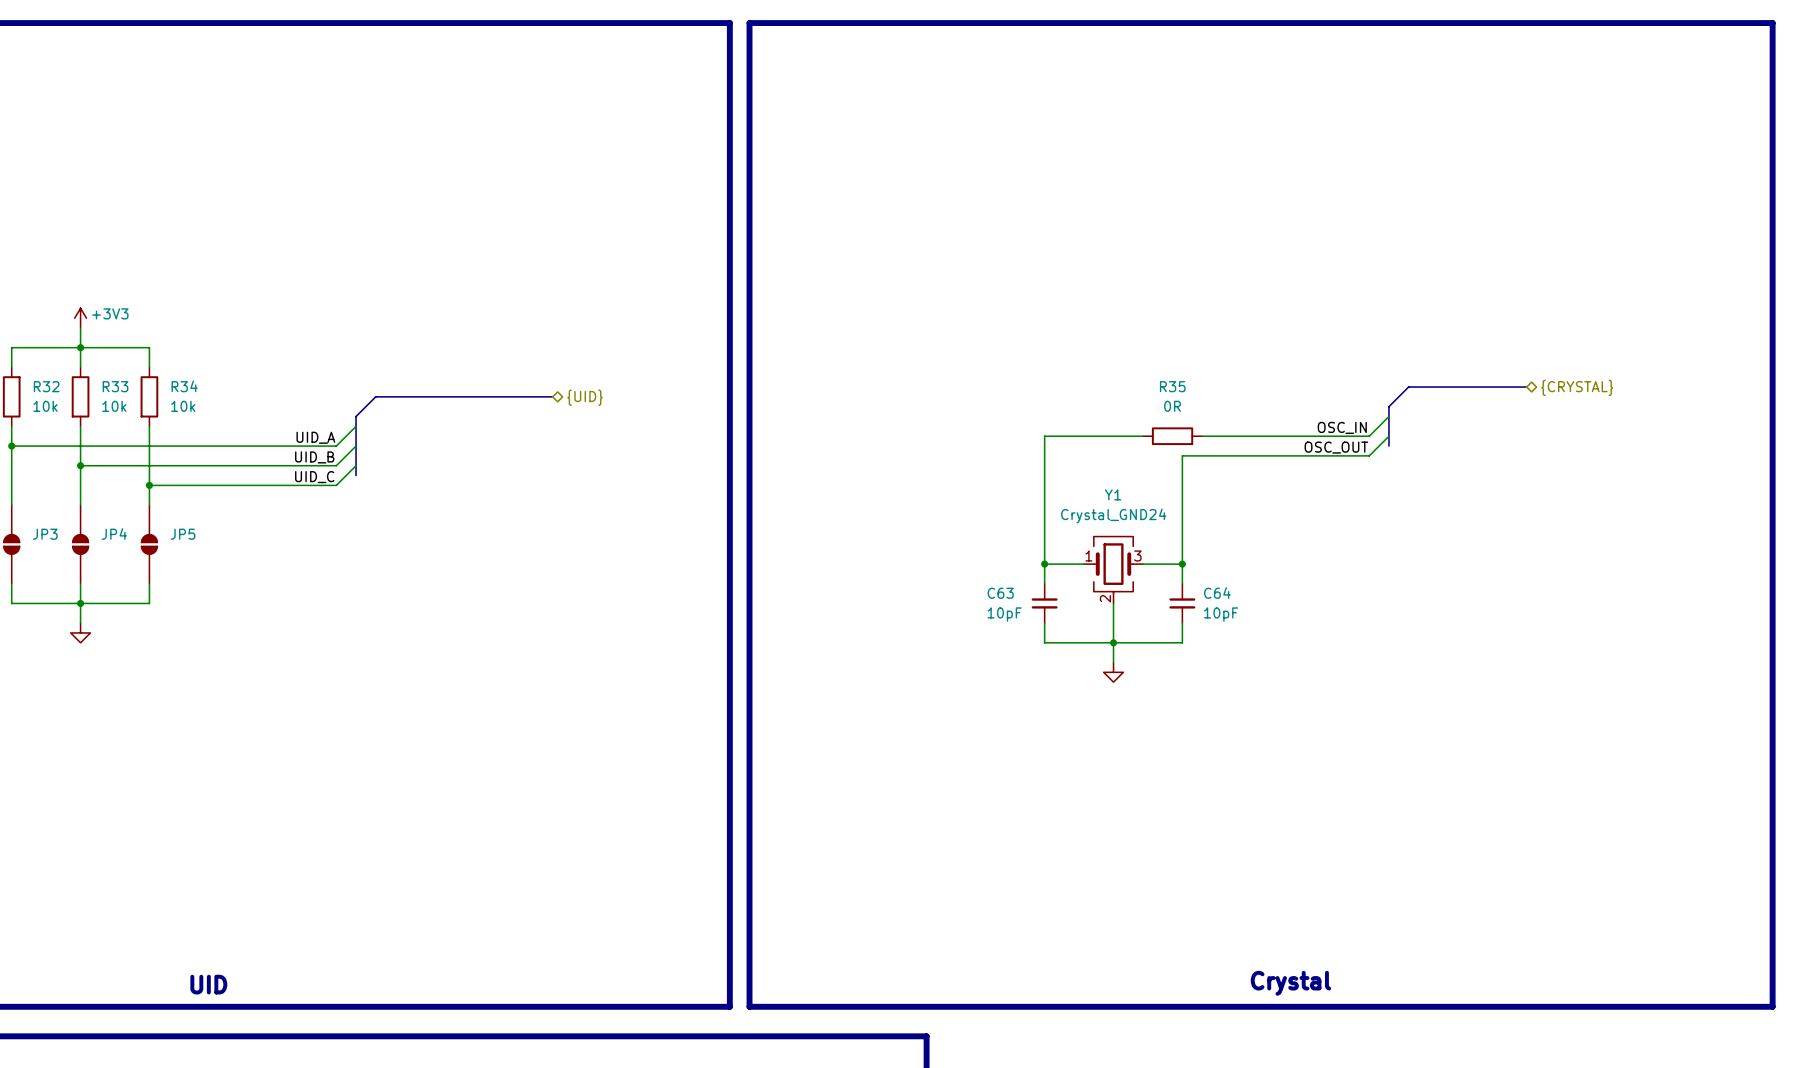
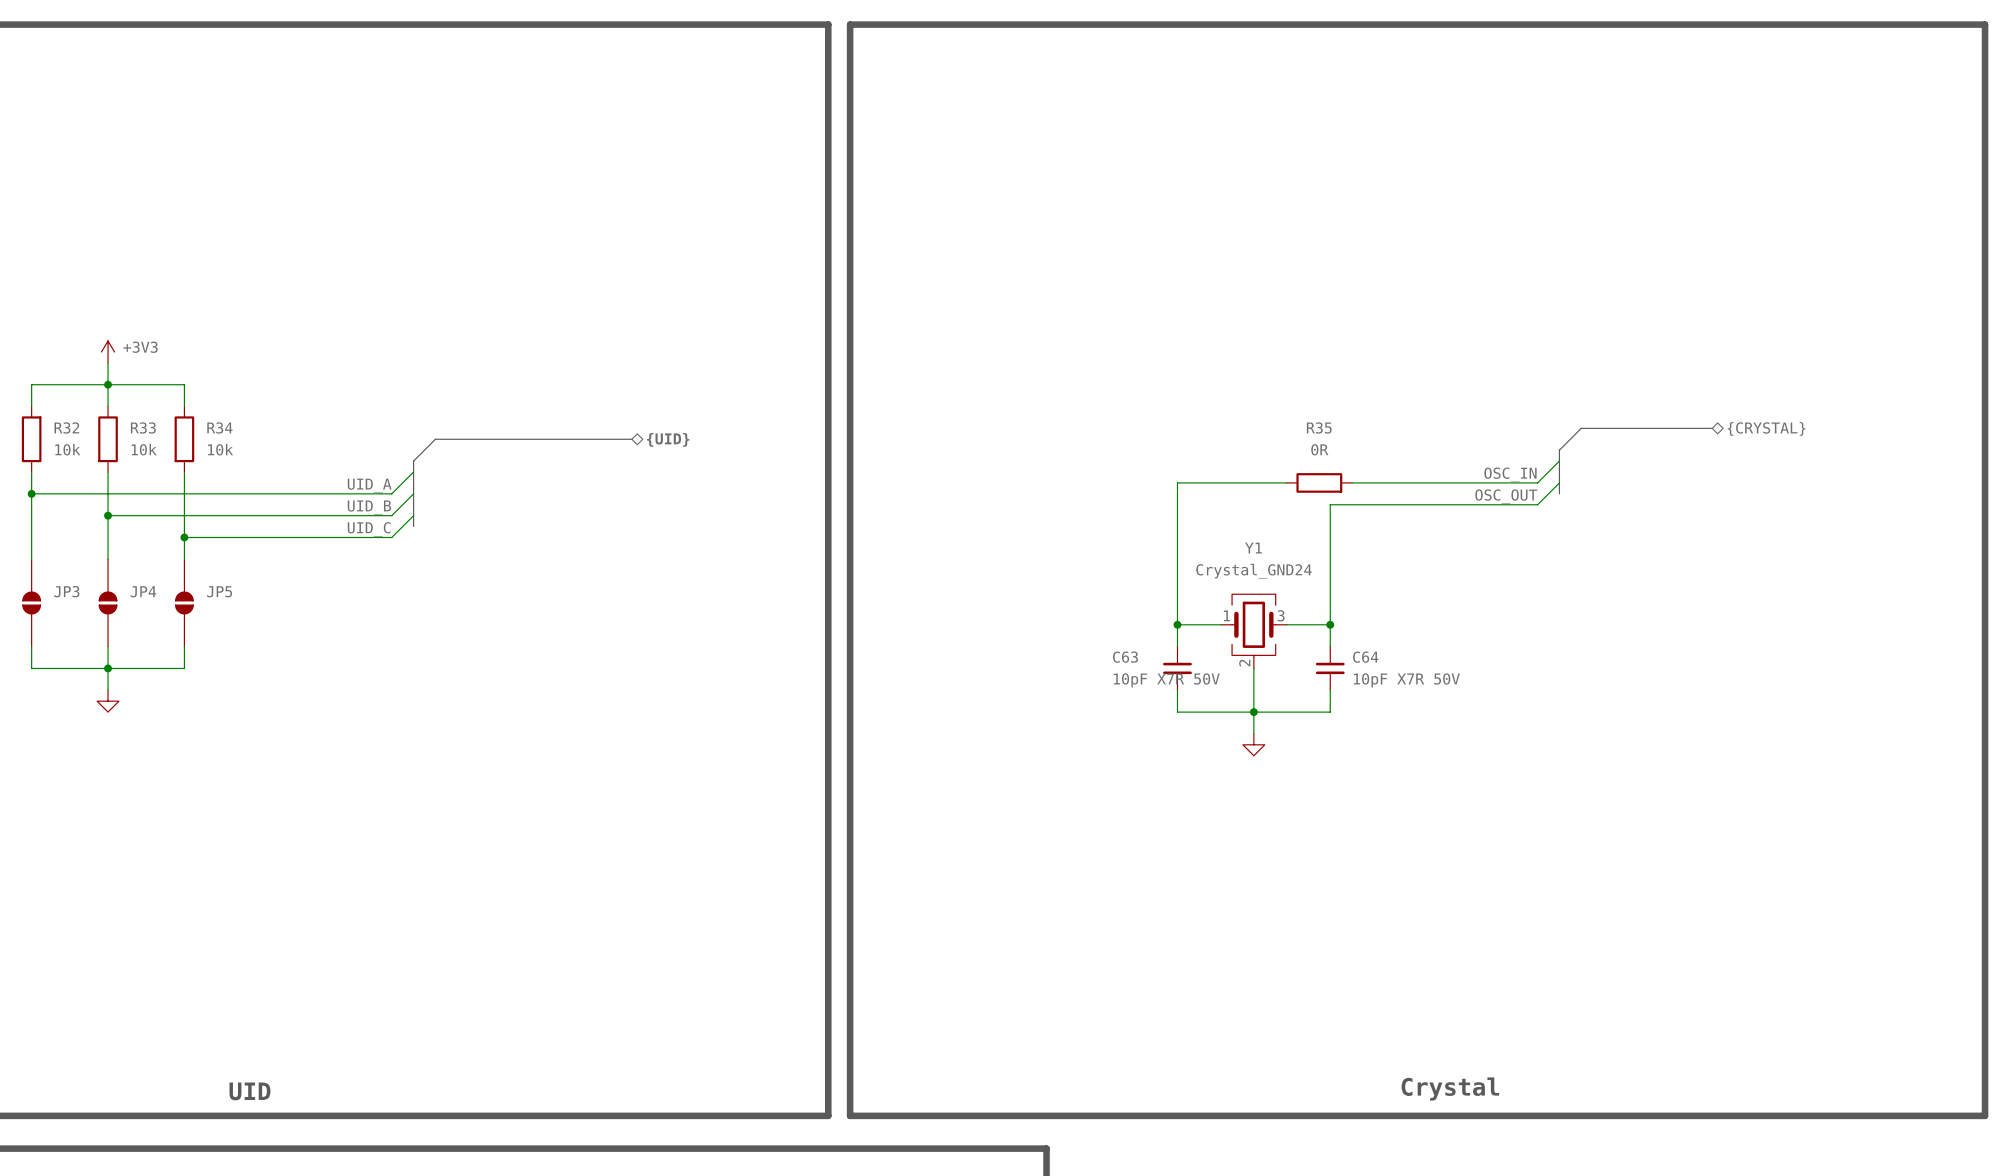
C63 value: 10pF (1004, 614) -> 10pF X7R 50V (1166, 680)
C64 value: 10pF (1221, 614) -> 10pF X7R 50V (1406, 680)

